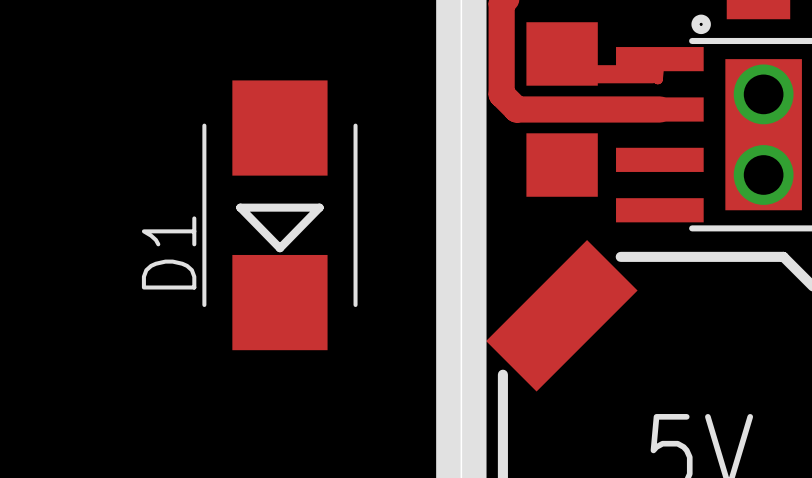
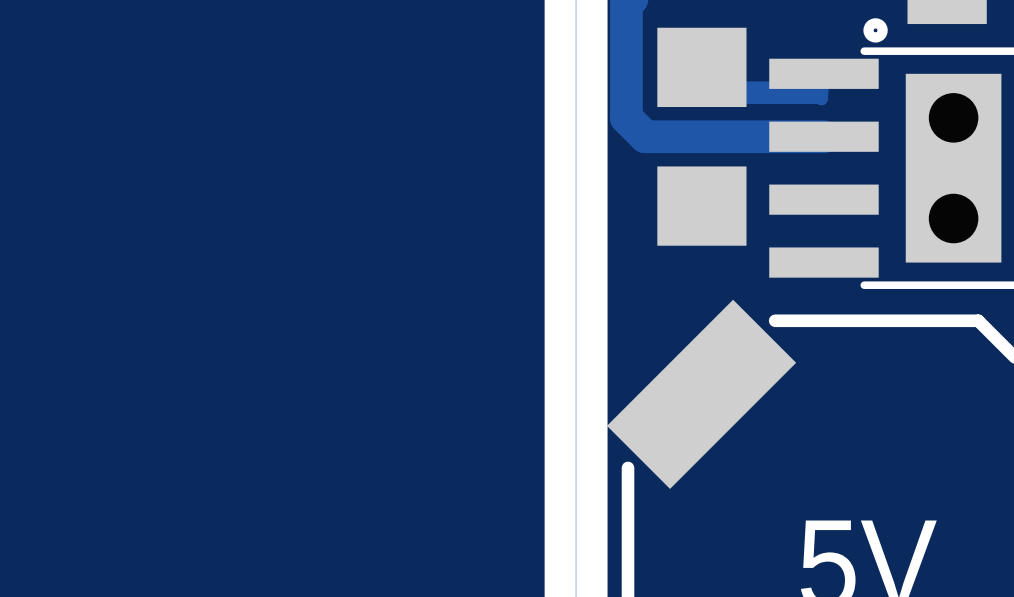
D1: (279, 215) -> none

